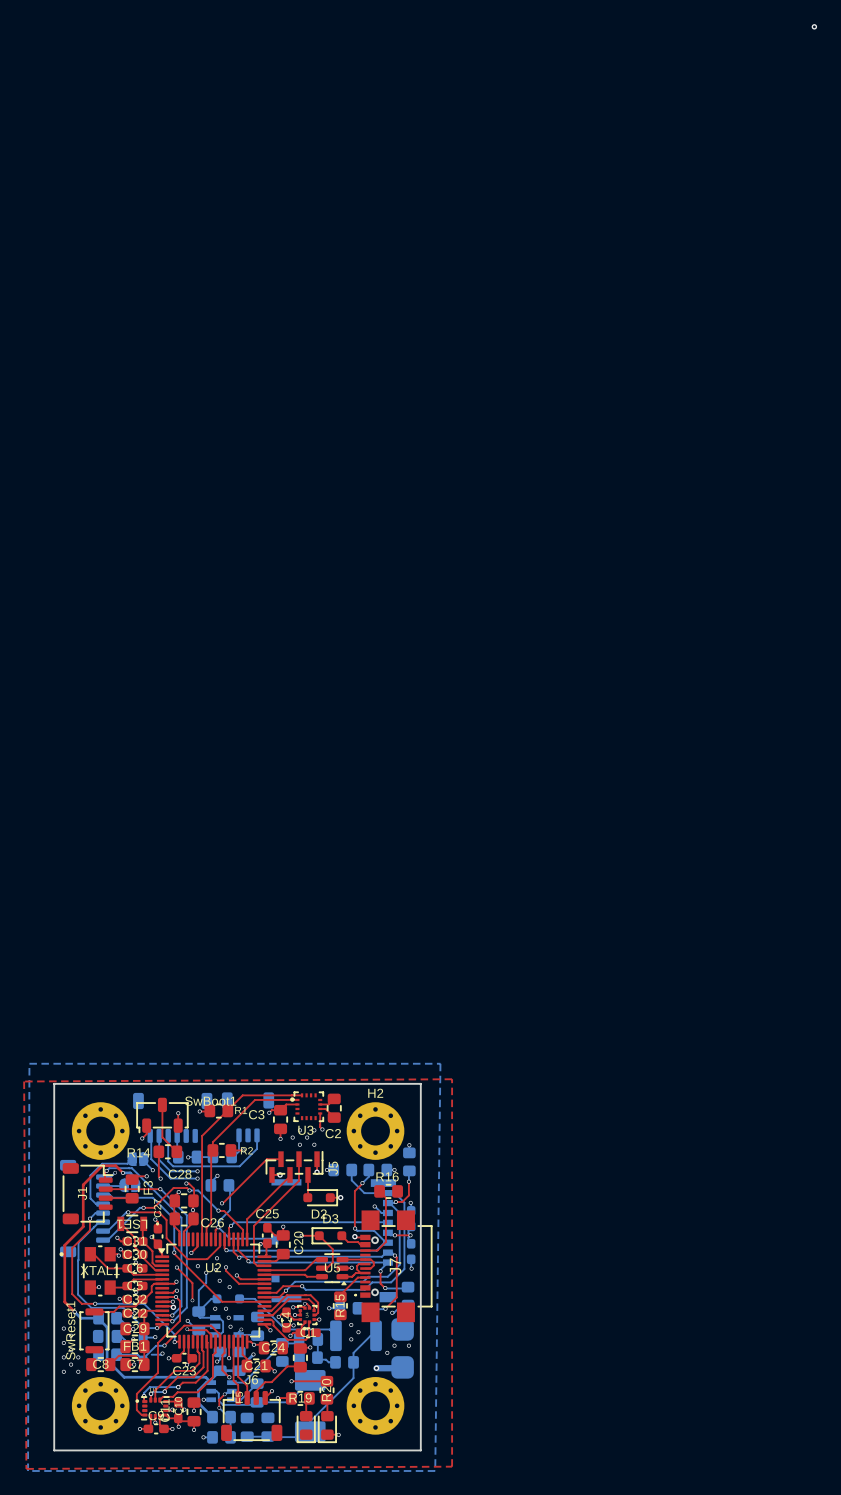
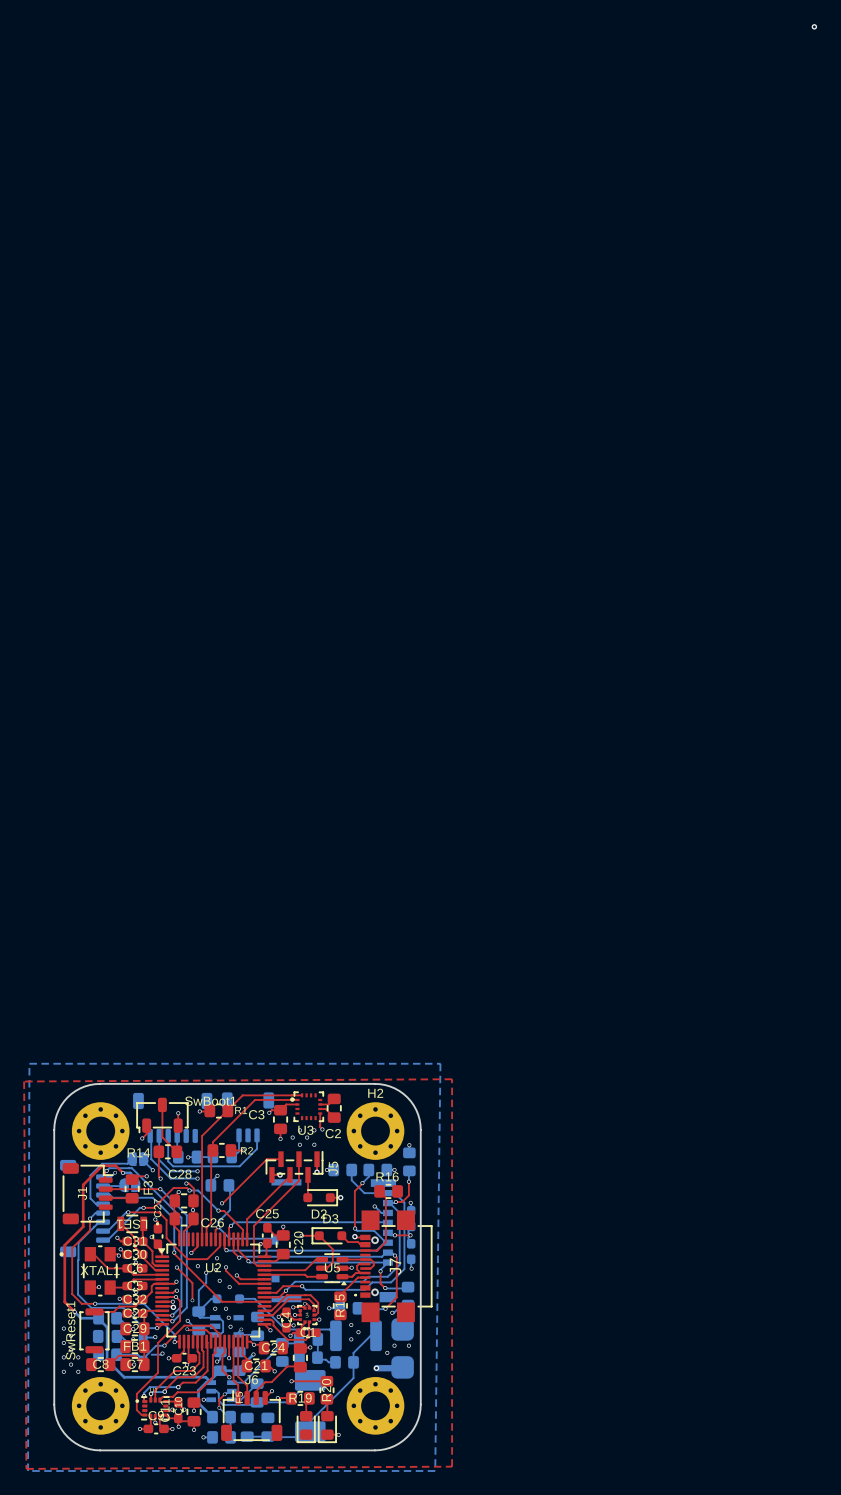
board edge: (420, 1129) (420, 1083) (54, 1083) (54, 1450) (420, 1450) (420, 1404) -> (54, 1129) (54, 1404) (58, 1424) (71, 1440) (84, 1447) (100, 1450) (380, 1450) (394, 1445) (407, 1436) (416, 1424) (420, 1404)
board edge: none -> (420, 1129) (416, 1109) (407, 1097) (394, 1088) (380, 1084) (99, 1083) (80, 1088) (67, 1097) (56, 1114) (54, 1129)

